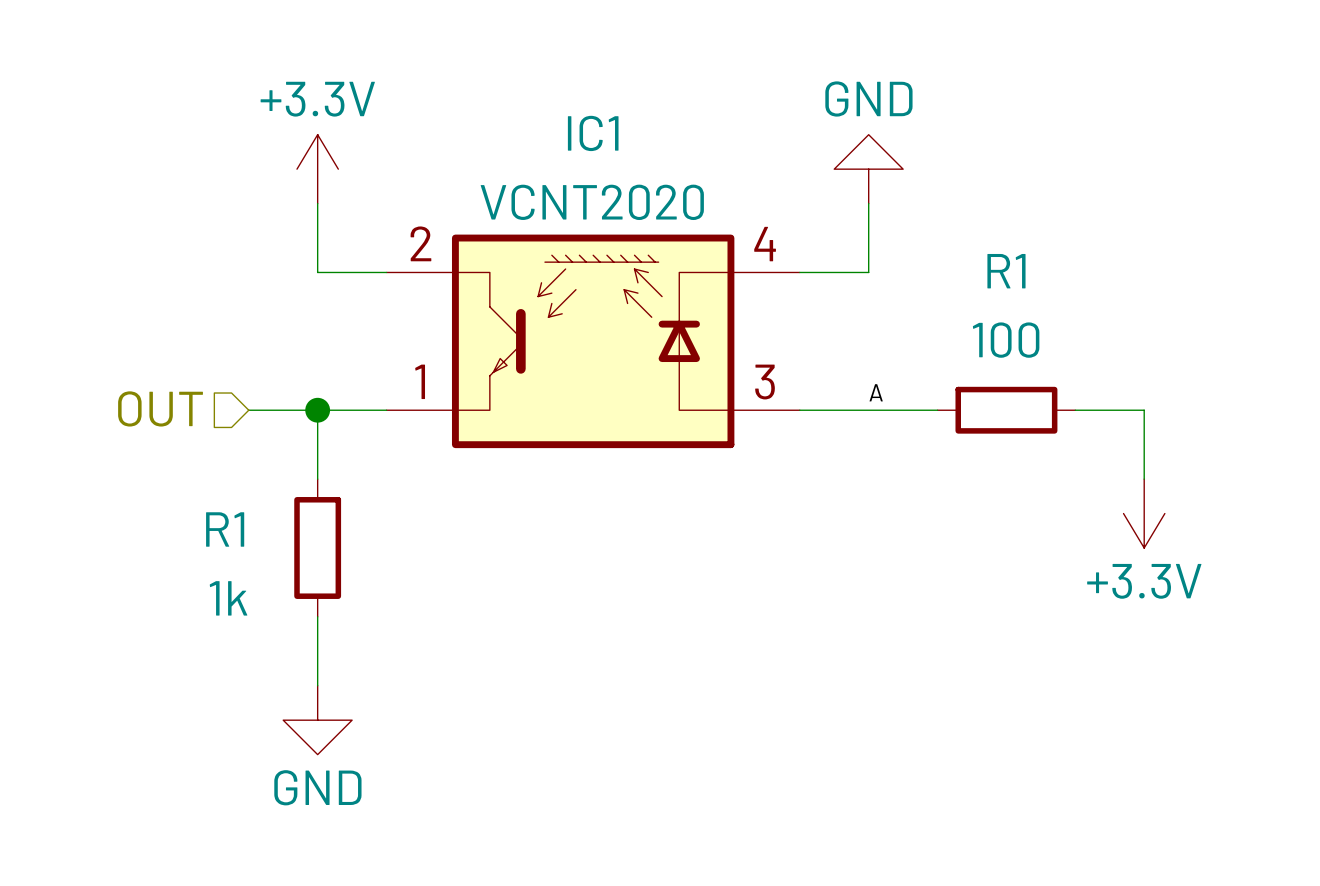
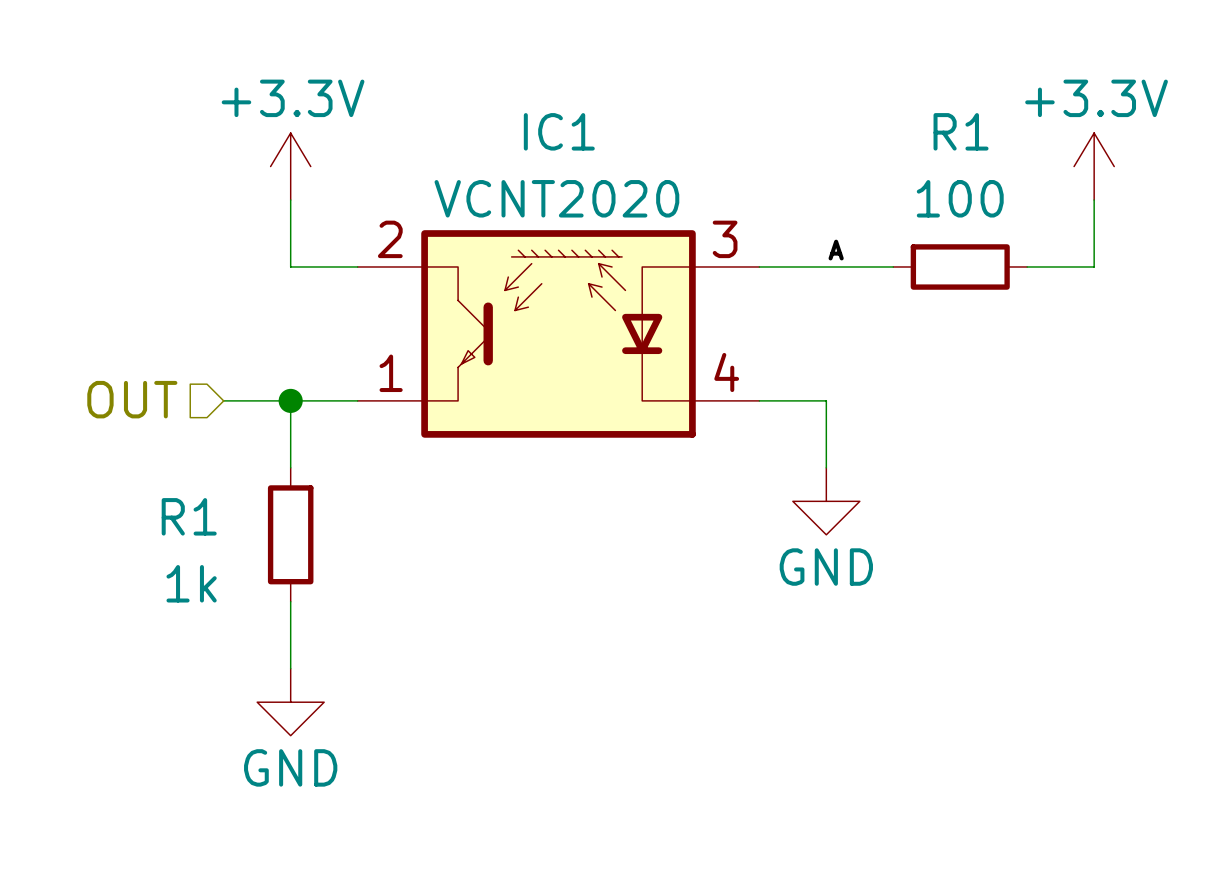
power symbol rotation: 0° (868, 169) -> 180° (826, 501)
power symbol position: GND (868, 169) -> GND (826, 501)
wire: (868, 203) (868, 272) -> (893, 266) (826, 266)
wire: none -> (1094, 200) (1094, 266) (1027, 266)
IC1 symbol: [386, 234, 800, 449] -> [357, 230, 760, 438]
label position: A (876, 392) -> A (836, 250)
wire: (868, 410) (937, 410) -> (826, 400) (826, 467)
R1 position: (1006, 410) -> (960, 266)
wire: (1075, 410) (1144, 410) (1144, 479) -> none
power symbol rotation: 0° (1144, 513) -> 180° (1094, 166)
power symbol position: +3.3V (1144, 513) -> +3.3V (1094, 166)

